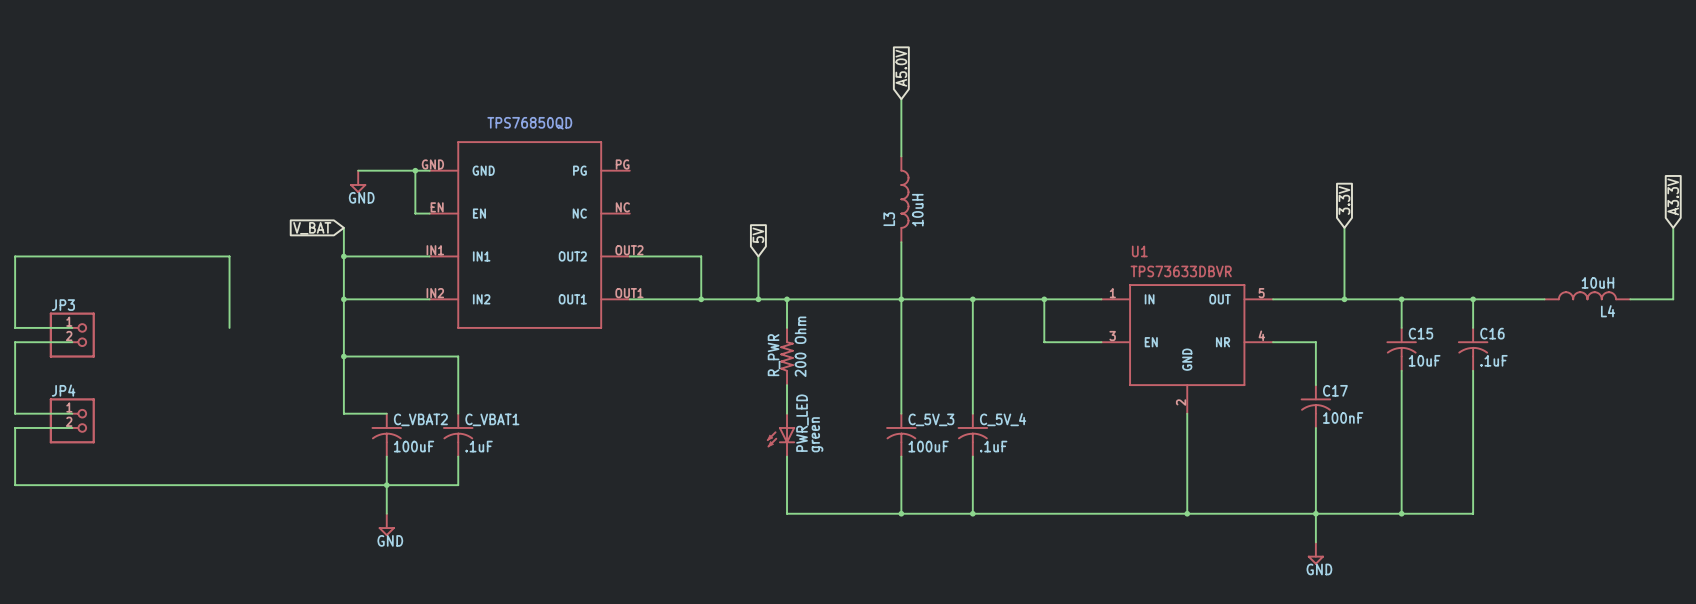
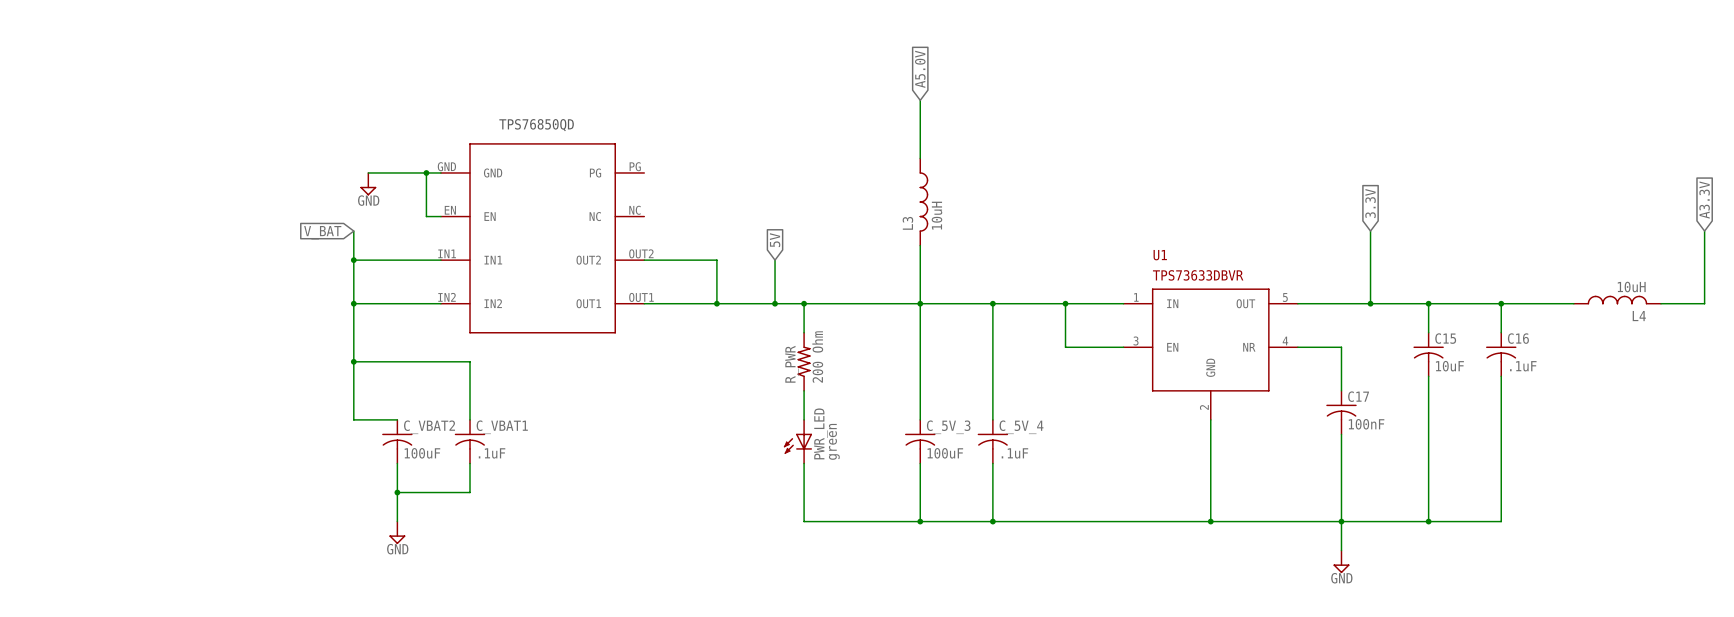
wire: (72, 327) (15, 327) (15, 256) (229, 256) (229, 327) -> none
JP3: (72, 335) -> none
wire: (72, 342) (15, 342) (15, 413) (72, 413) -> none
JP4: (72, 420) -> none
wire: (72, 427) (15, 427) (15, 485) (386, 485) -> none

